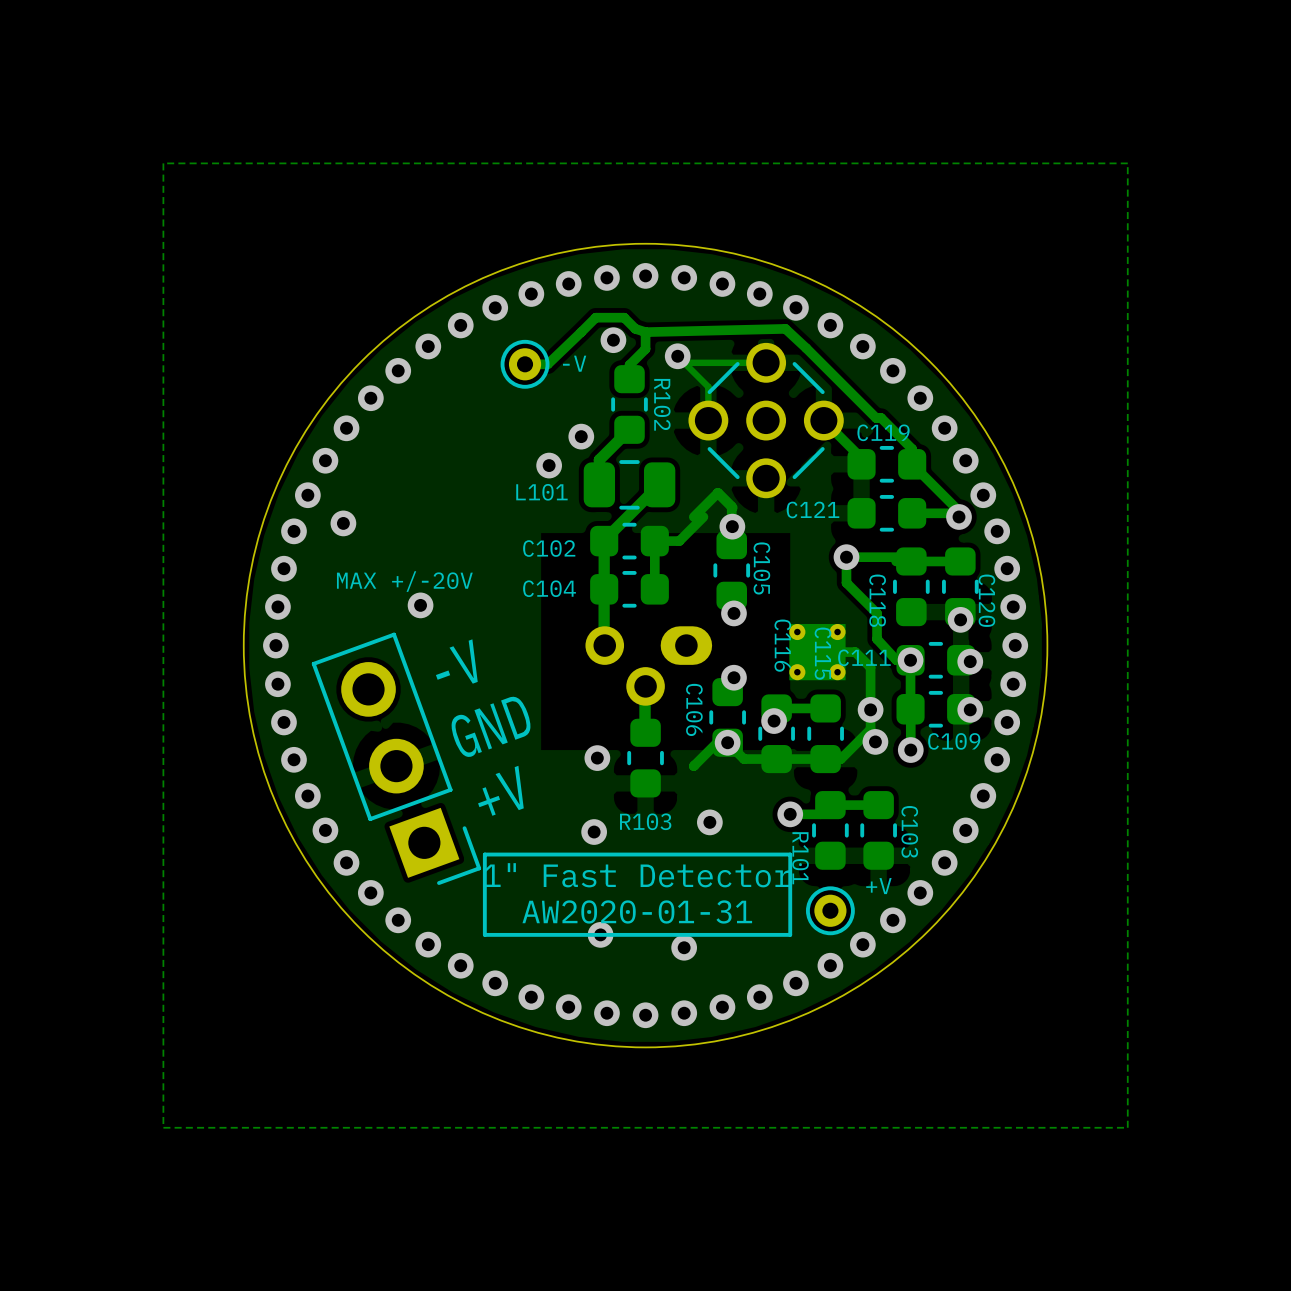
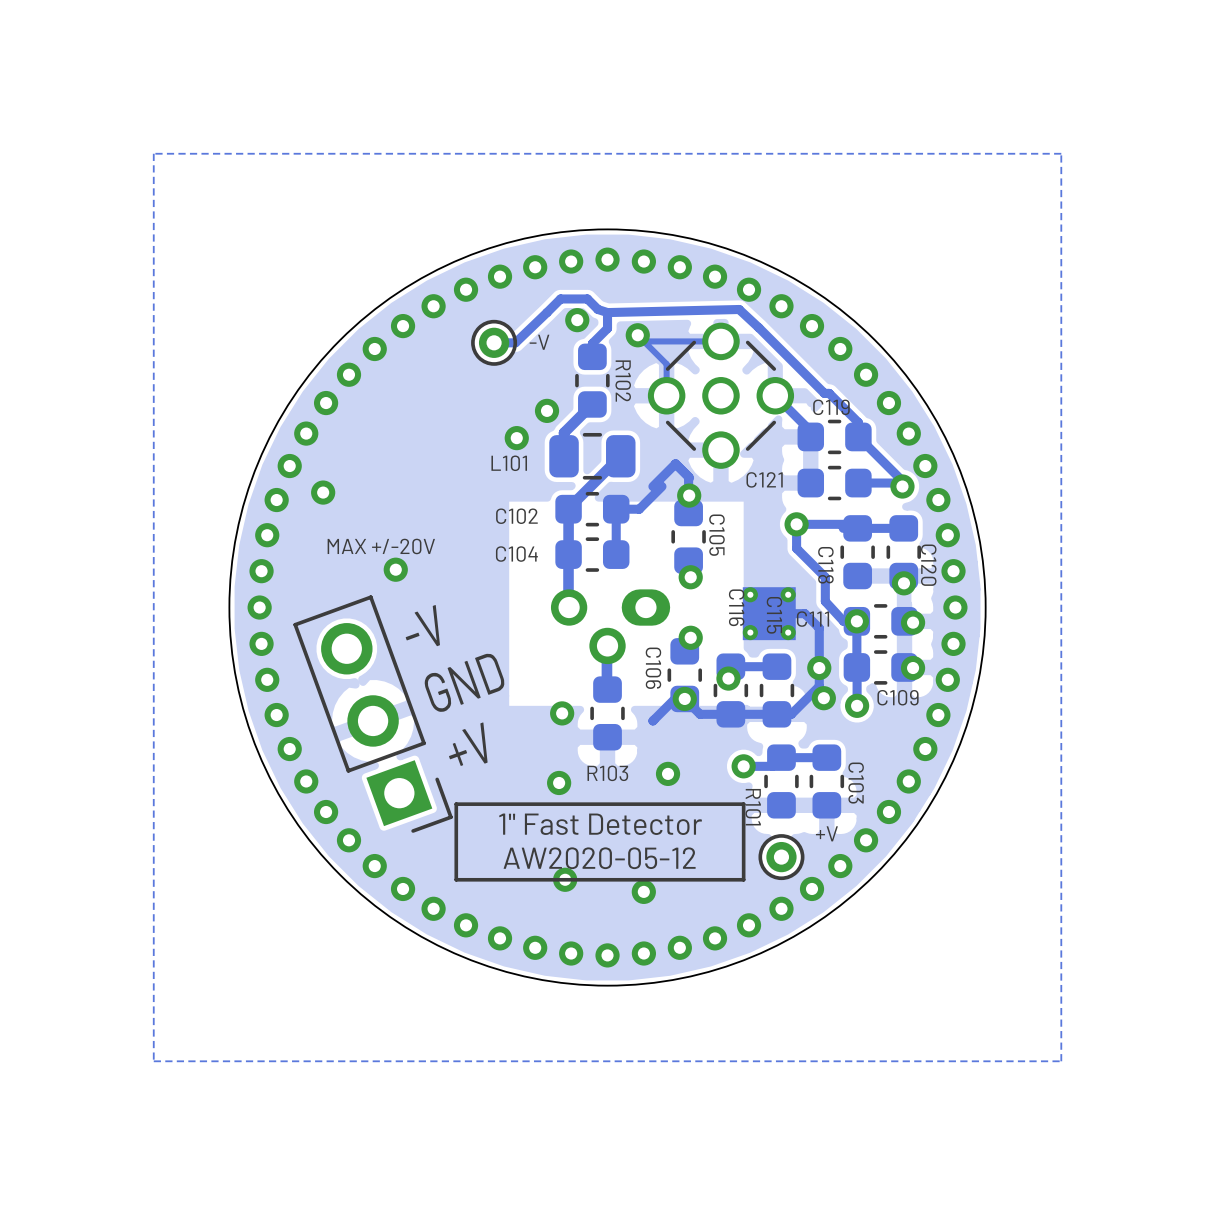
text: AW2020-01-31 (637, 911) -> AW2020-05-12 (599, 858)

